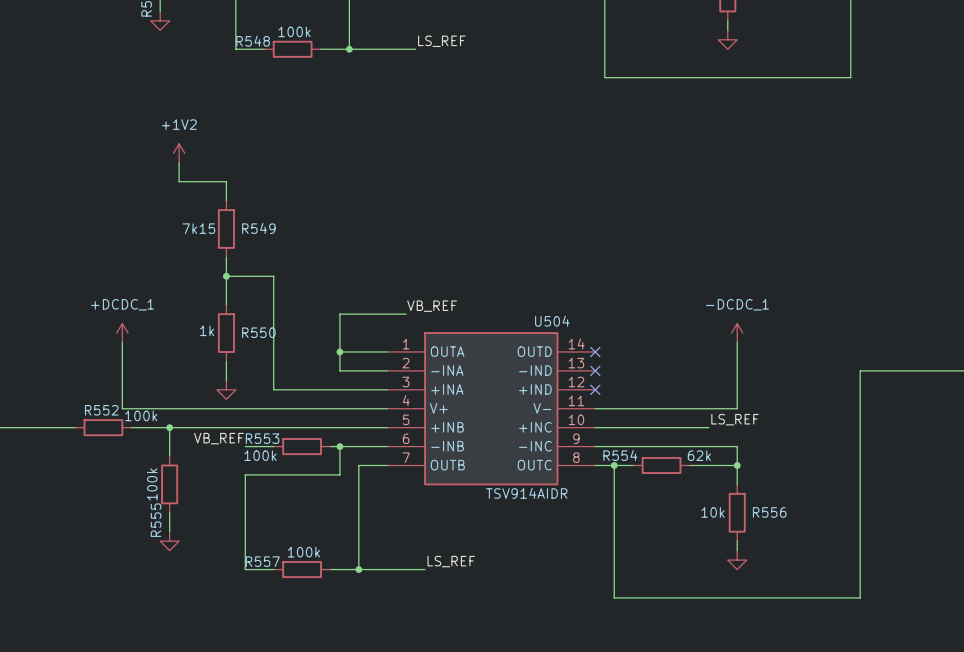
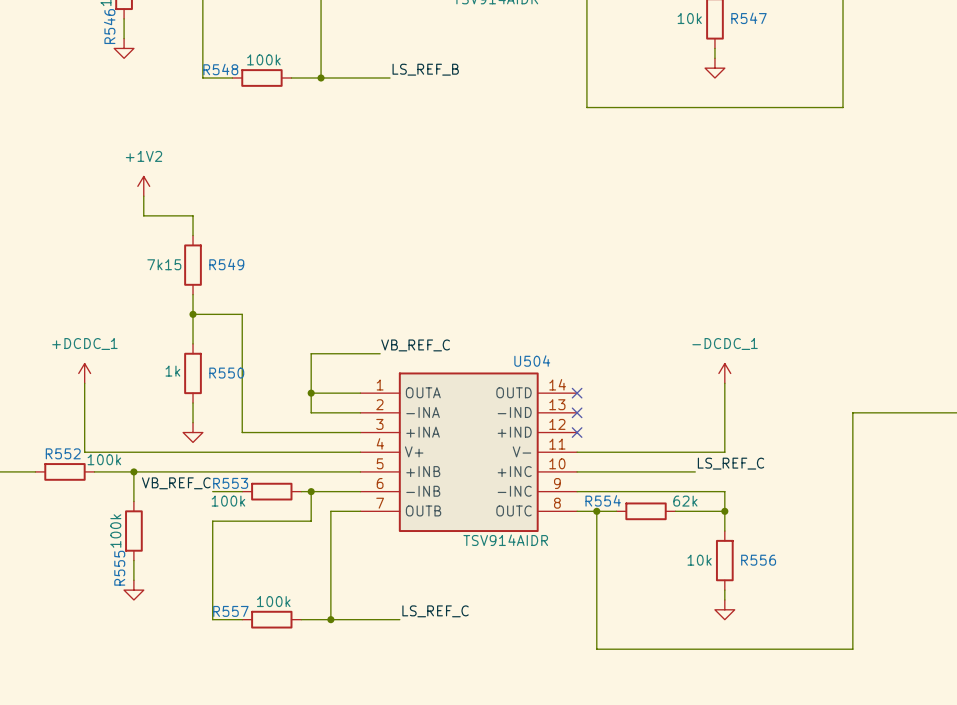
label: LS_REF (441, 41) -> LS_REF_B (425, 69)
label: VB_REF (432, 306) -> VB_REF_C (415, 345)
label: LS_REF (735, 419) -> LS_REF_C (730, 463)
label: VB_REF (218, 438) -> VB_REF_C (176, 483)
label: LS_REF (451, 561) -> LS_REF_C (435, 611)

